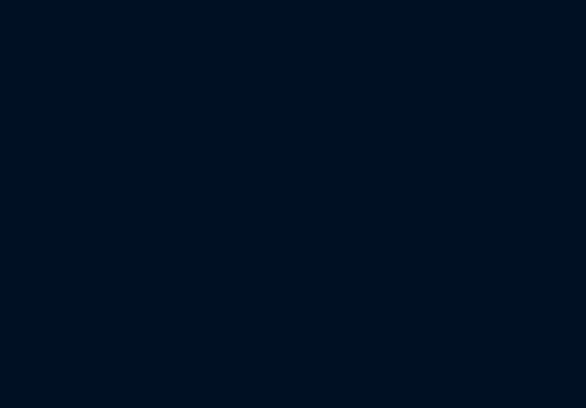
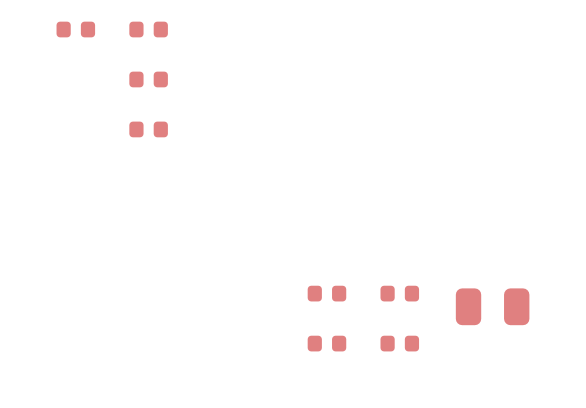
part: none -> (75, 29)
part: none -> (148, 29)
part: none -> (148, 79)
part: none -> (148, 129)
part: none -> (326, 293)
part: none -> (399, 293)
part: none -> (492, 306)
part: none -> (326, 343)
part: none -> (399, 343)

